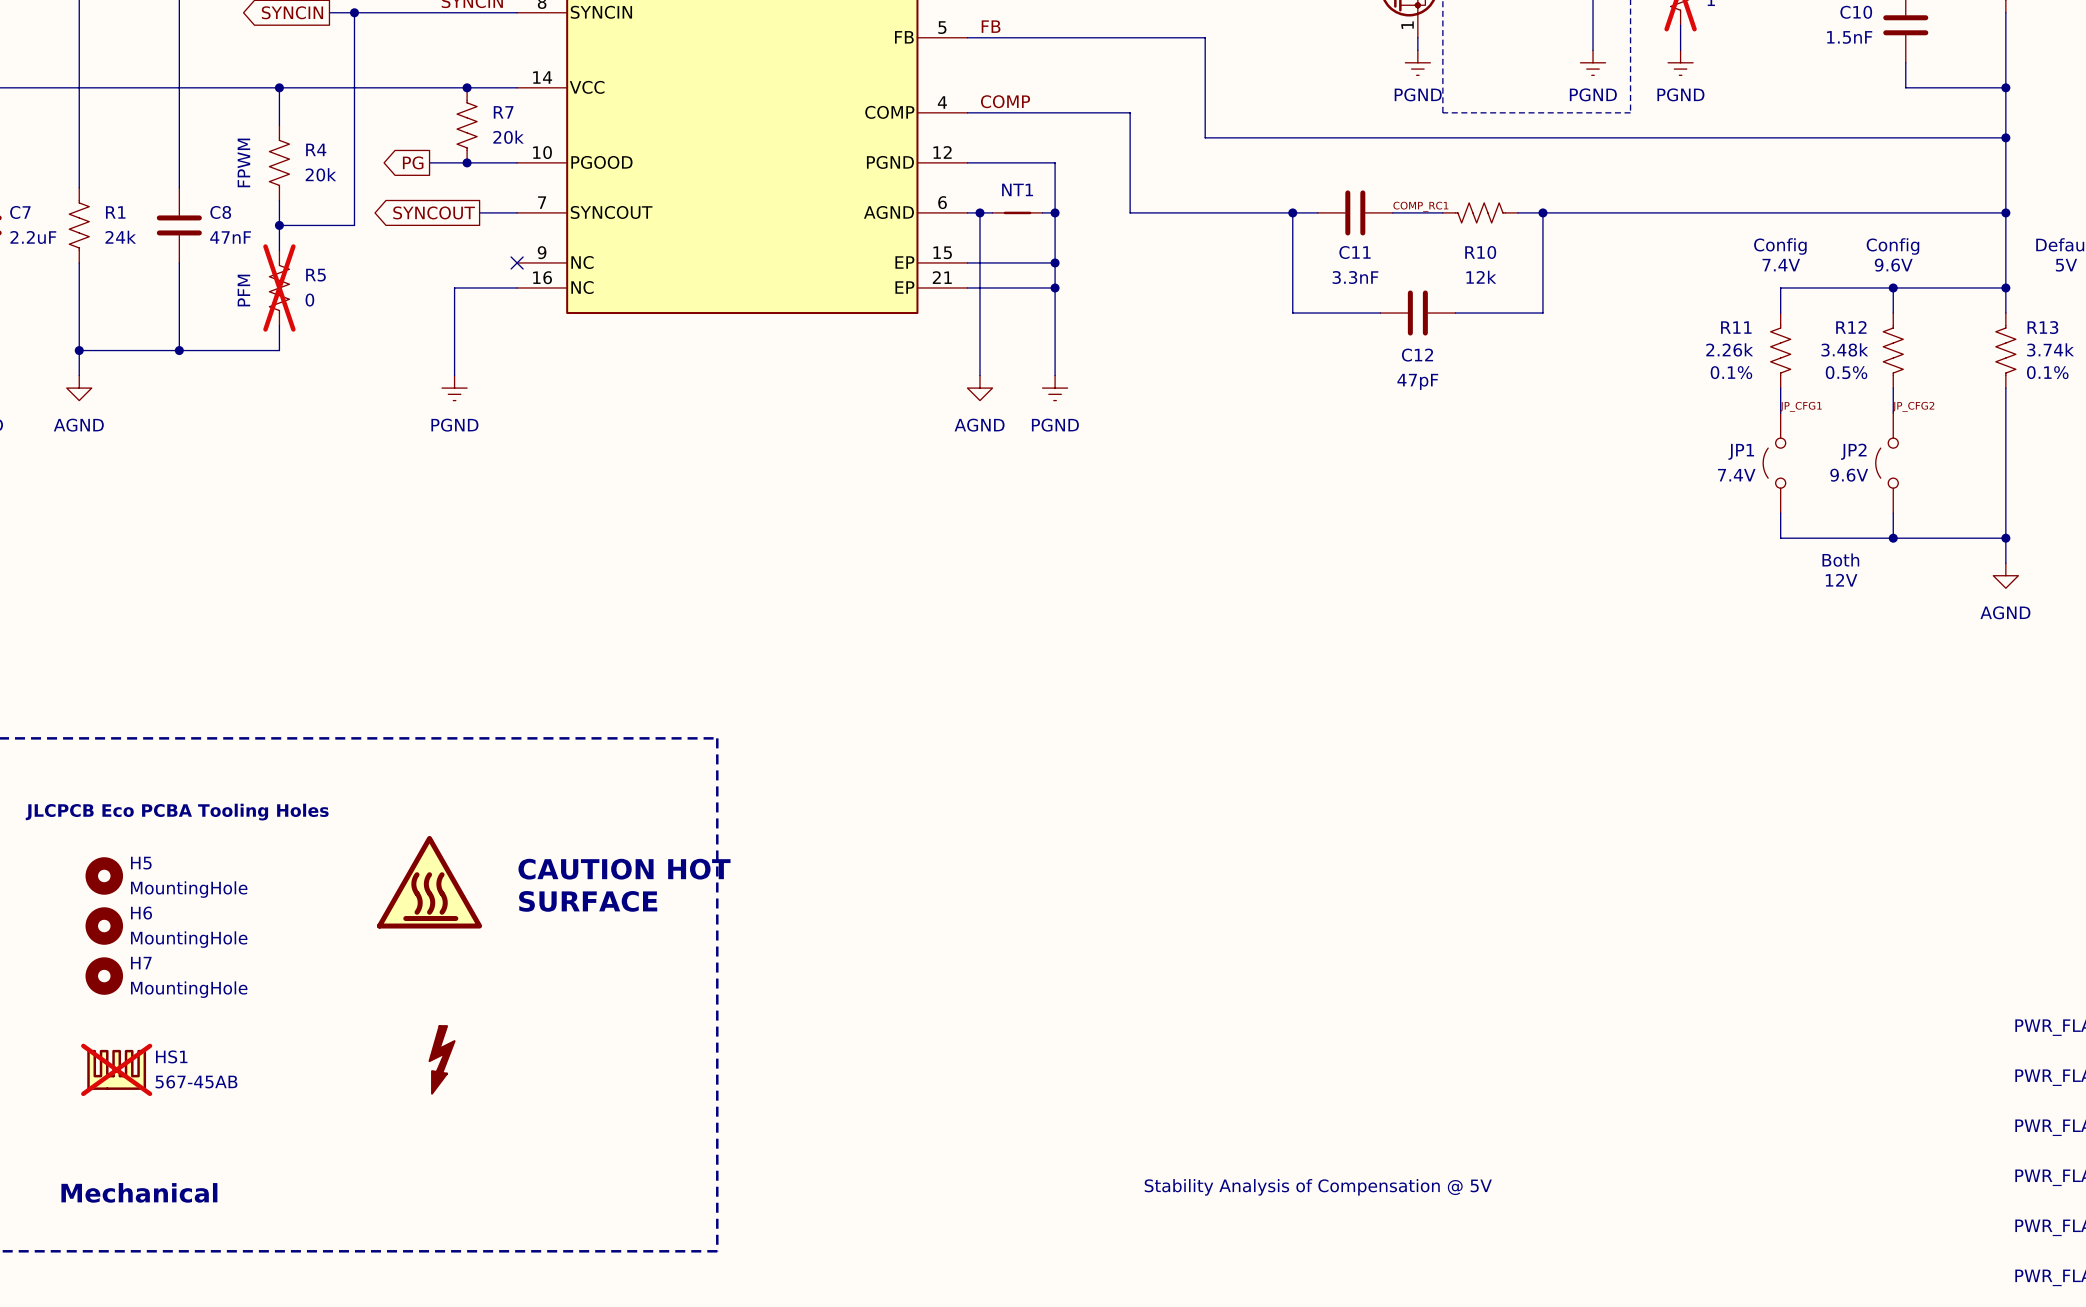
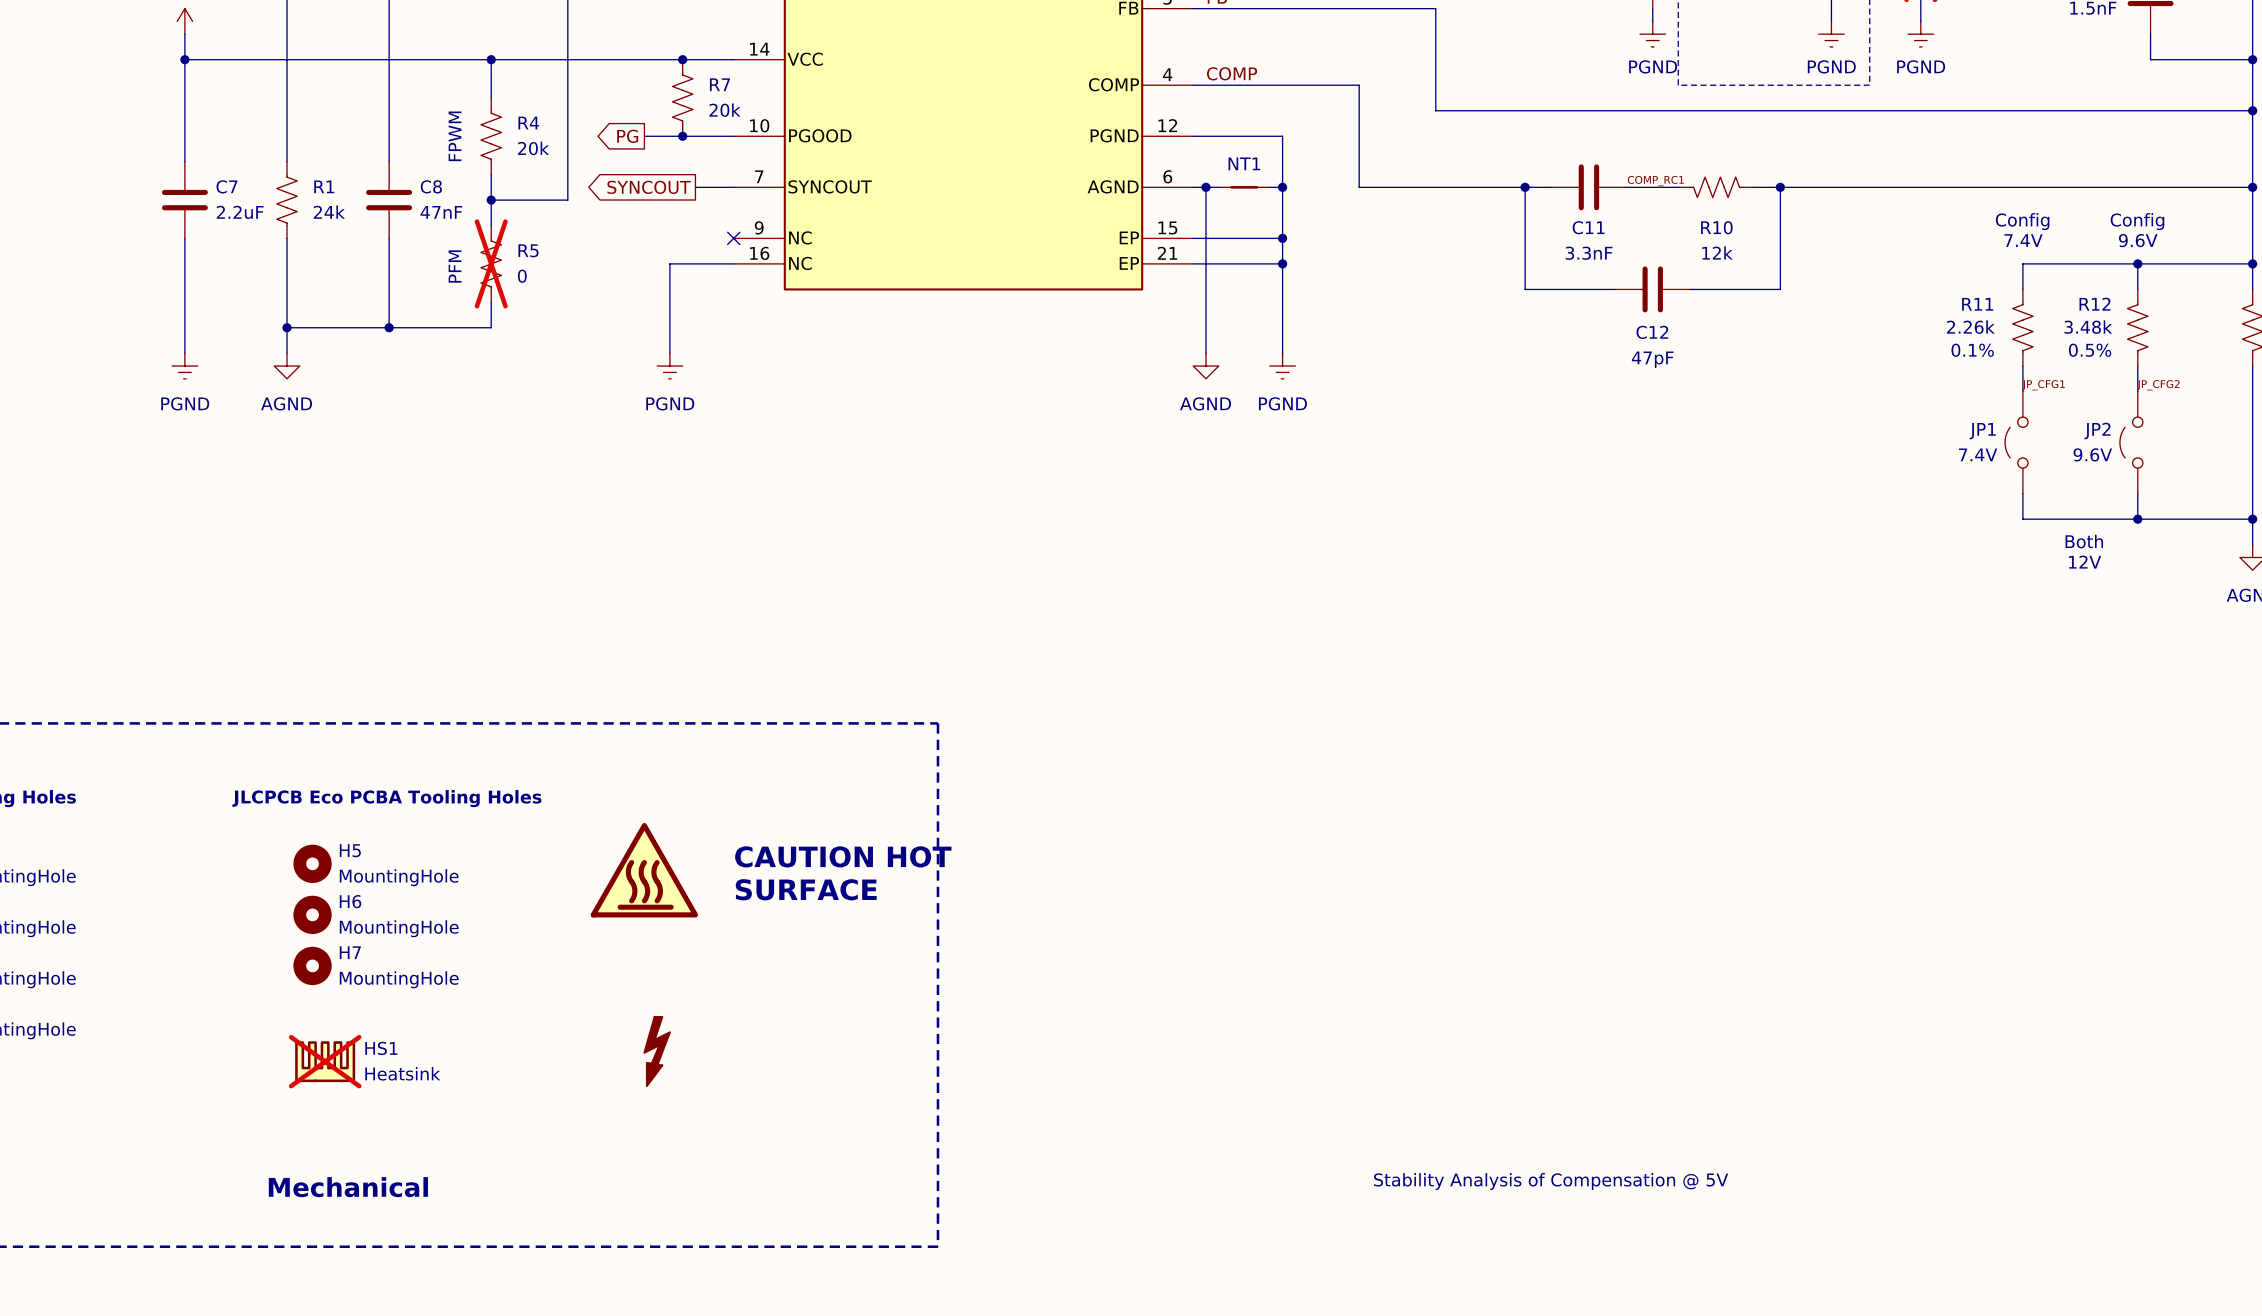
HS1 value: 567-45AB (196, 1081) -> Heatsink (402, 1073)

